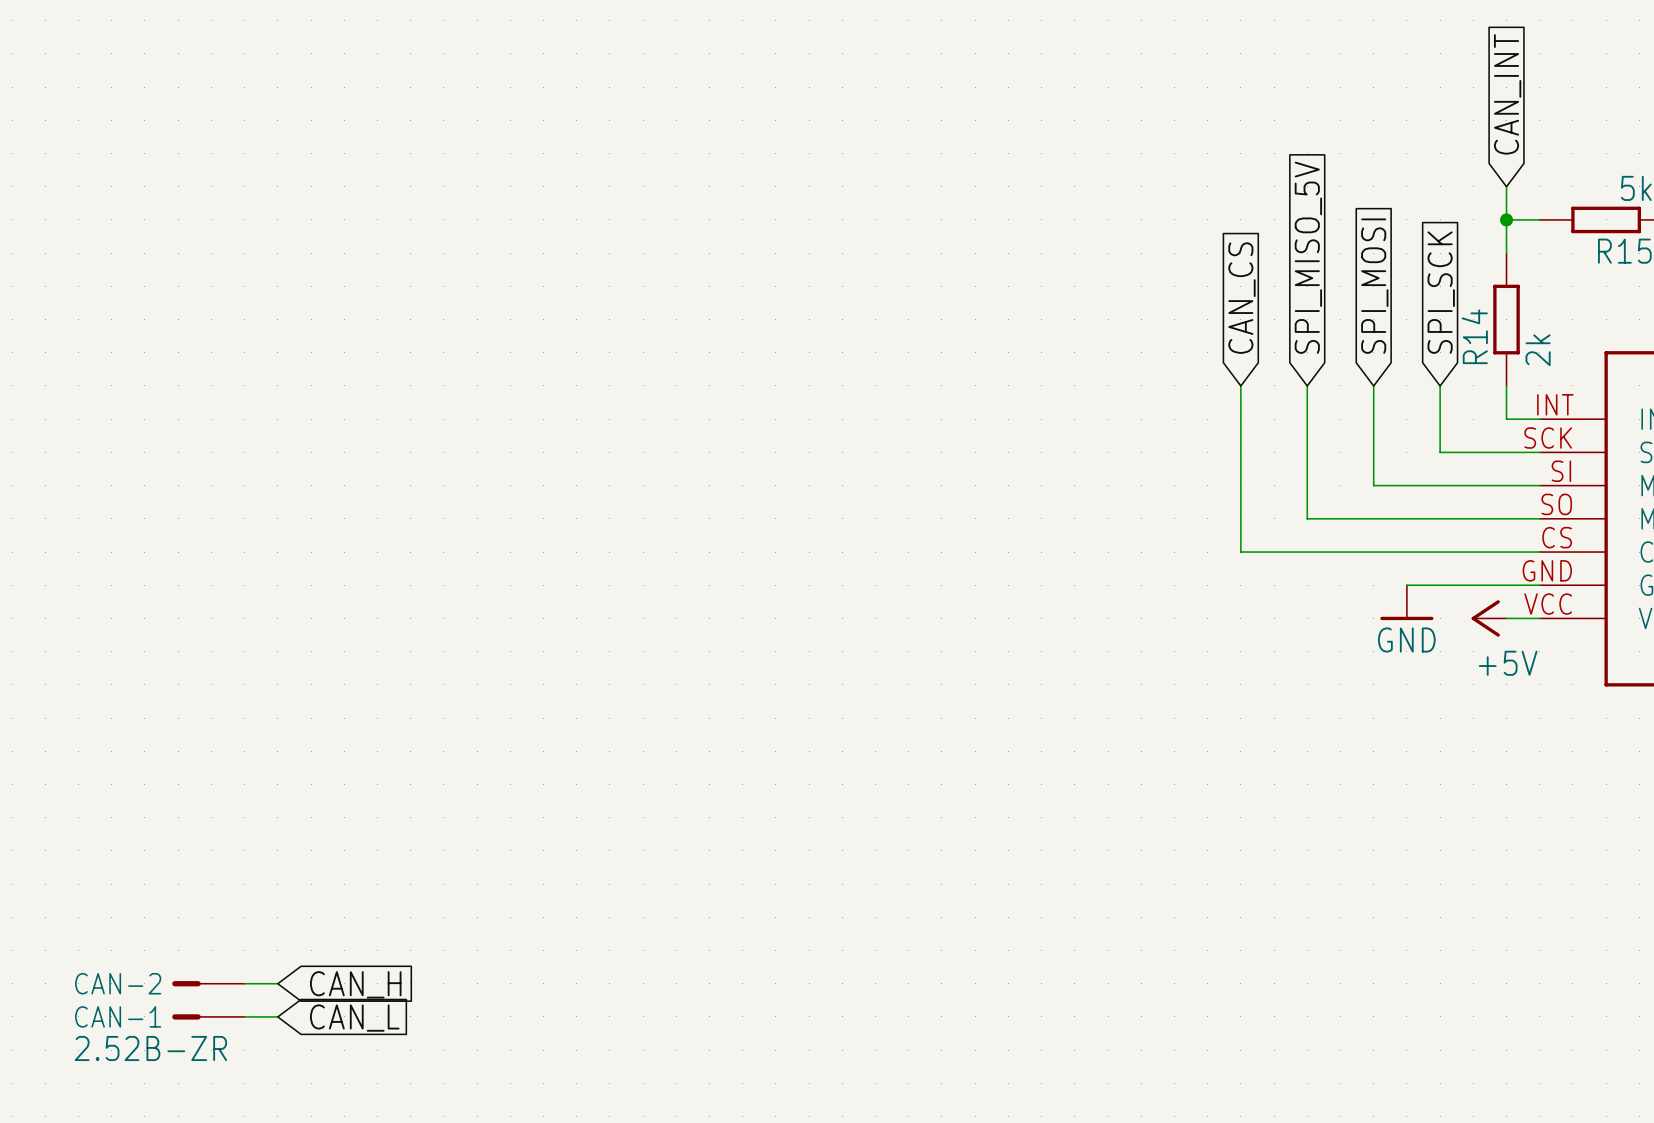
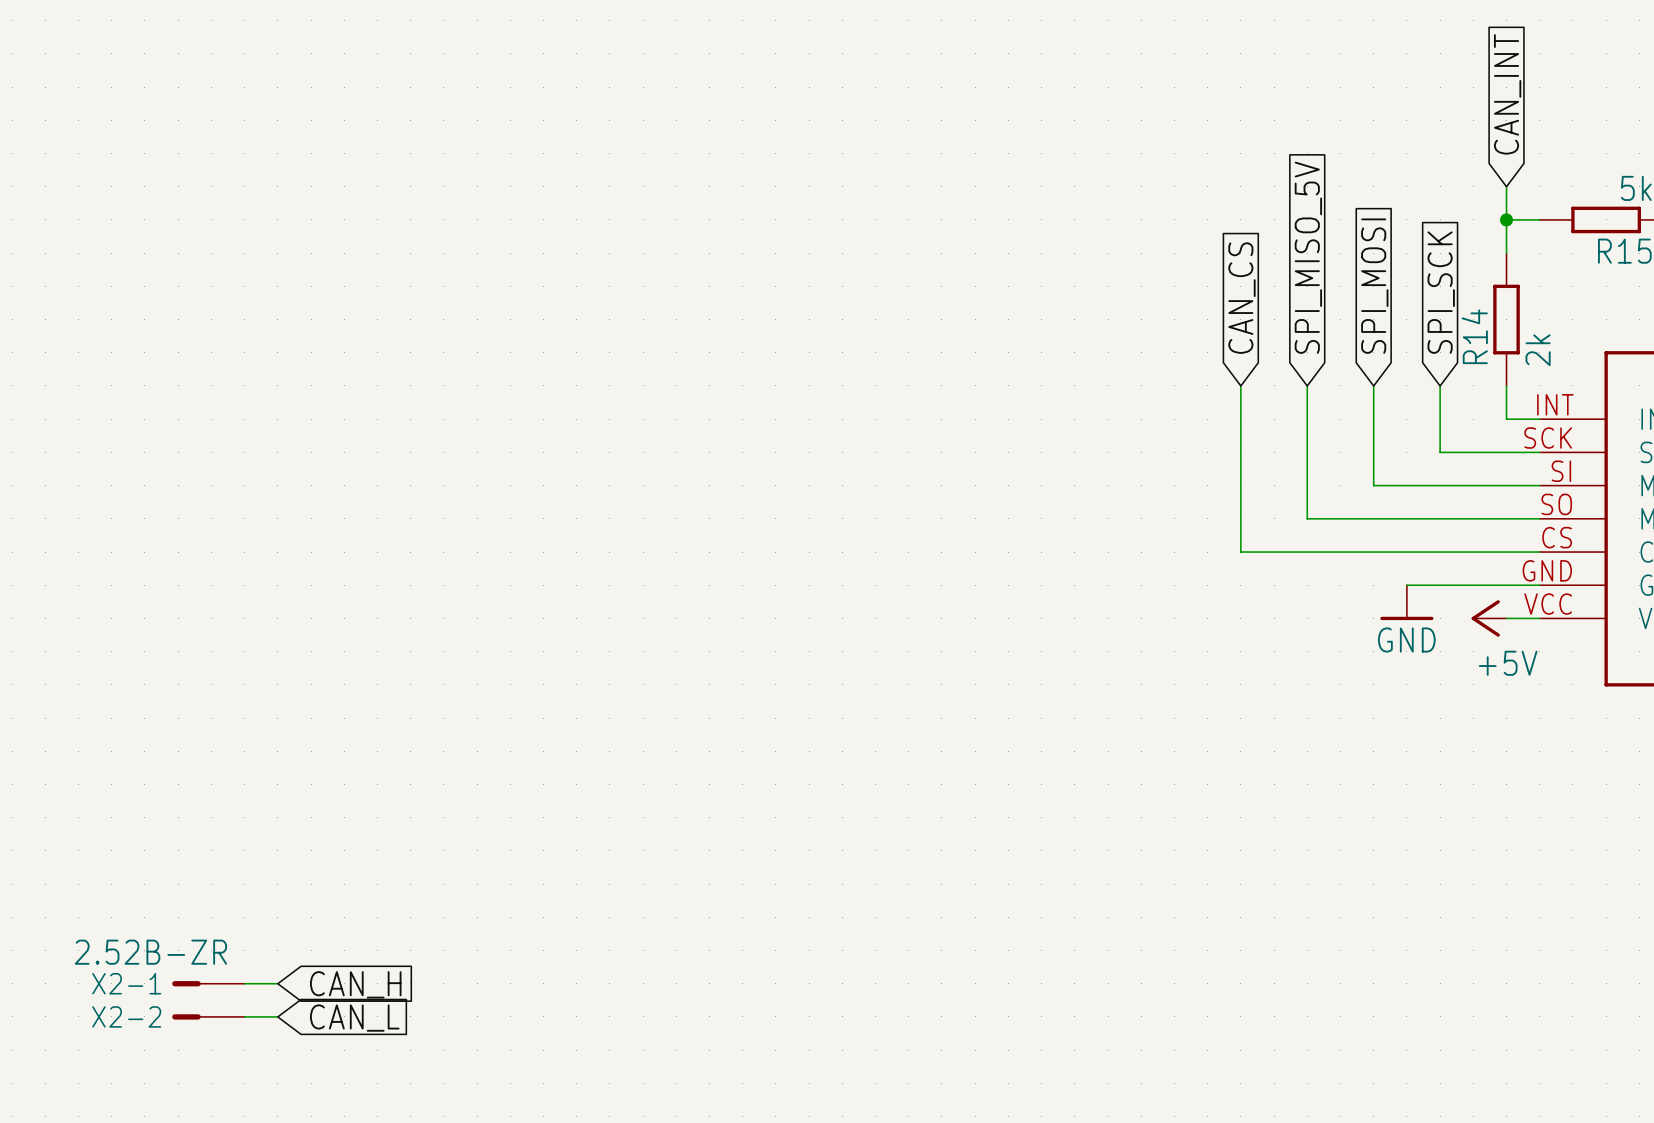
CAN-2 value: none -> 2.52B-ZR (150, 952)
CAN-2 name: CAN-2 (118, 983) -> X2-1 (126, 983)
CAN-1 name: CAN-1 (118, 1016) -> X2-2 (126, 1016)
CAN-1 value: 2.52B-ZR (150, 1048) -> none

